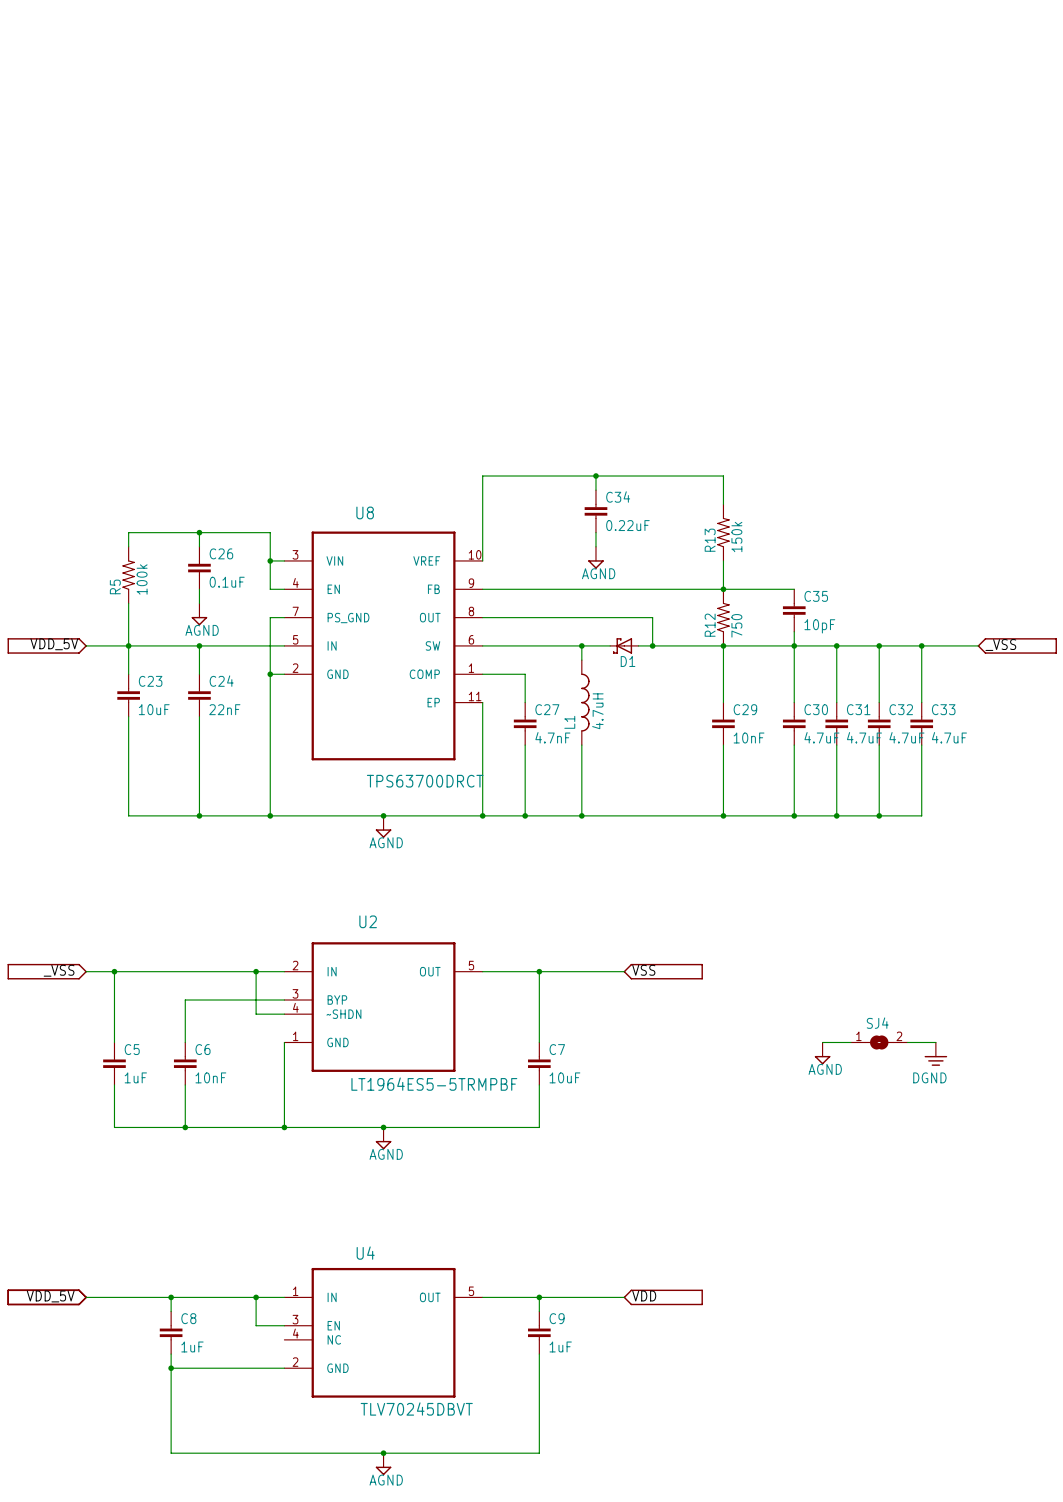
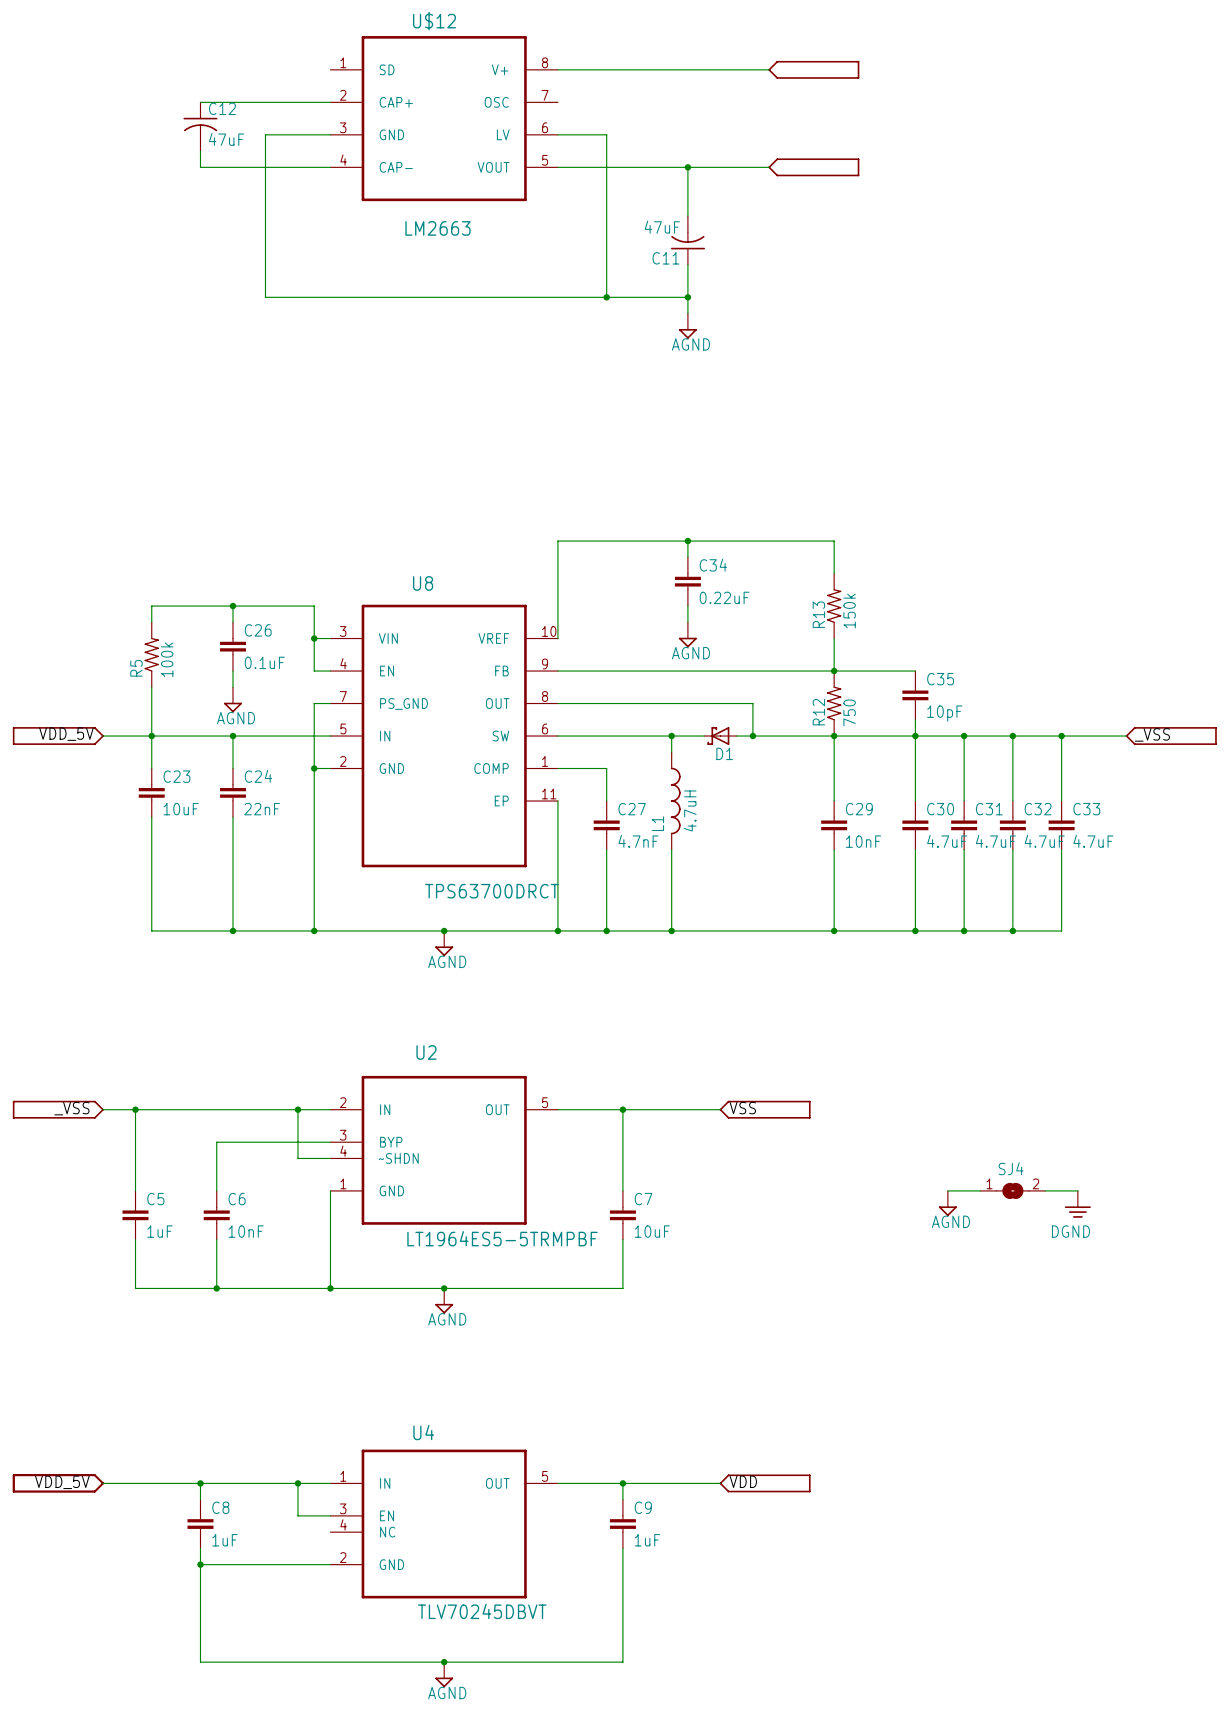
wire: none -> (557, 69) (769, 69)
part: none -> (813, 69)
wire: none -> (200, 102) (330, 102)
U$12: none -> LM2663 (444, 118)
C12: none -> 47uF (200, 126)
wire: none -> (330, 134) (265, 134) (265, 297) (687, 297)
wire: none -> (557, 134) (606, 134) (606, 297)
wire: none -> (200, 151) (200, 167) (330, 167)
wire: none -> (557, 167) (769, 167)
wire: none -> (687, 167) (687, 216)
junction: none -> (687, 167)
part: none -> (813, 167)
C11: none -> 47uF (687, 240)
wire: none -> (687, 264) (687, 313)
junction: none -> (606, 297)
junction: none -> (687, 297)
power symbol: none -> AGND (687, 326)

